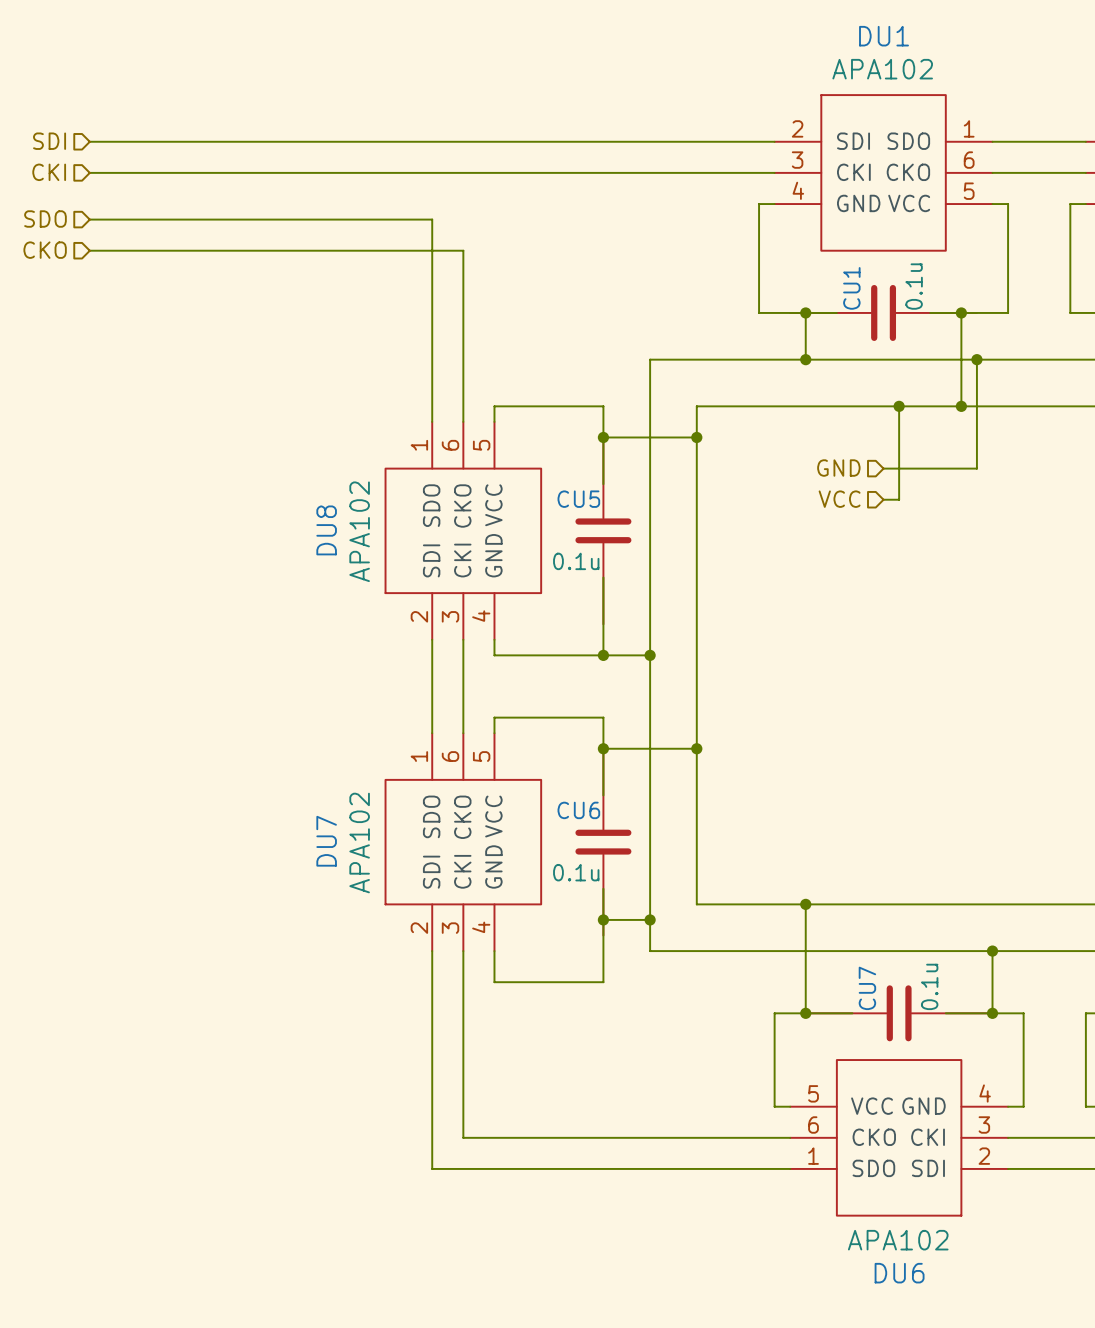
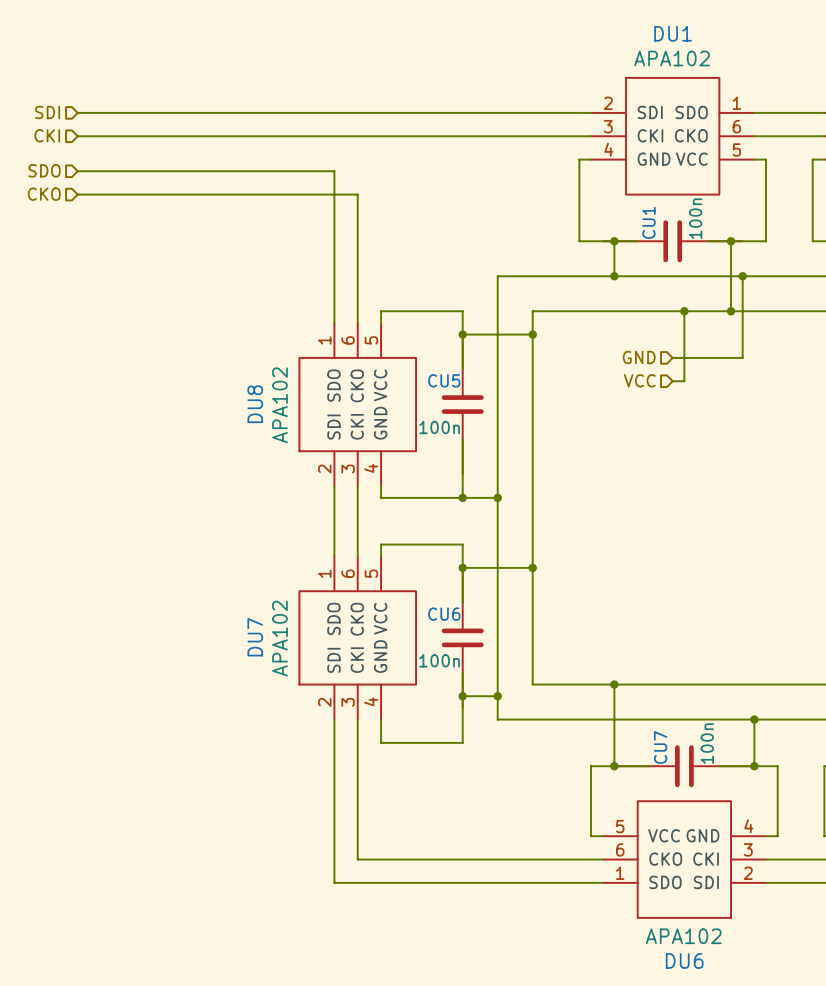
CU1 value: 0.1u (914, 286) -> 100n (695, 218)
CU5 value: 0.1u (576, 561) -> 100n (439, 427)
CU6 value: 0.1u (576, 872) -> 100n (439, 660)
CU7 value: 0.1u (929, 986) -> 100n (707, 743)

